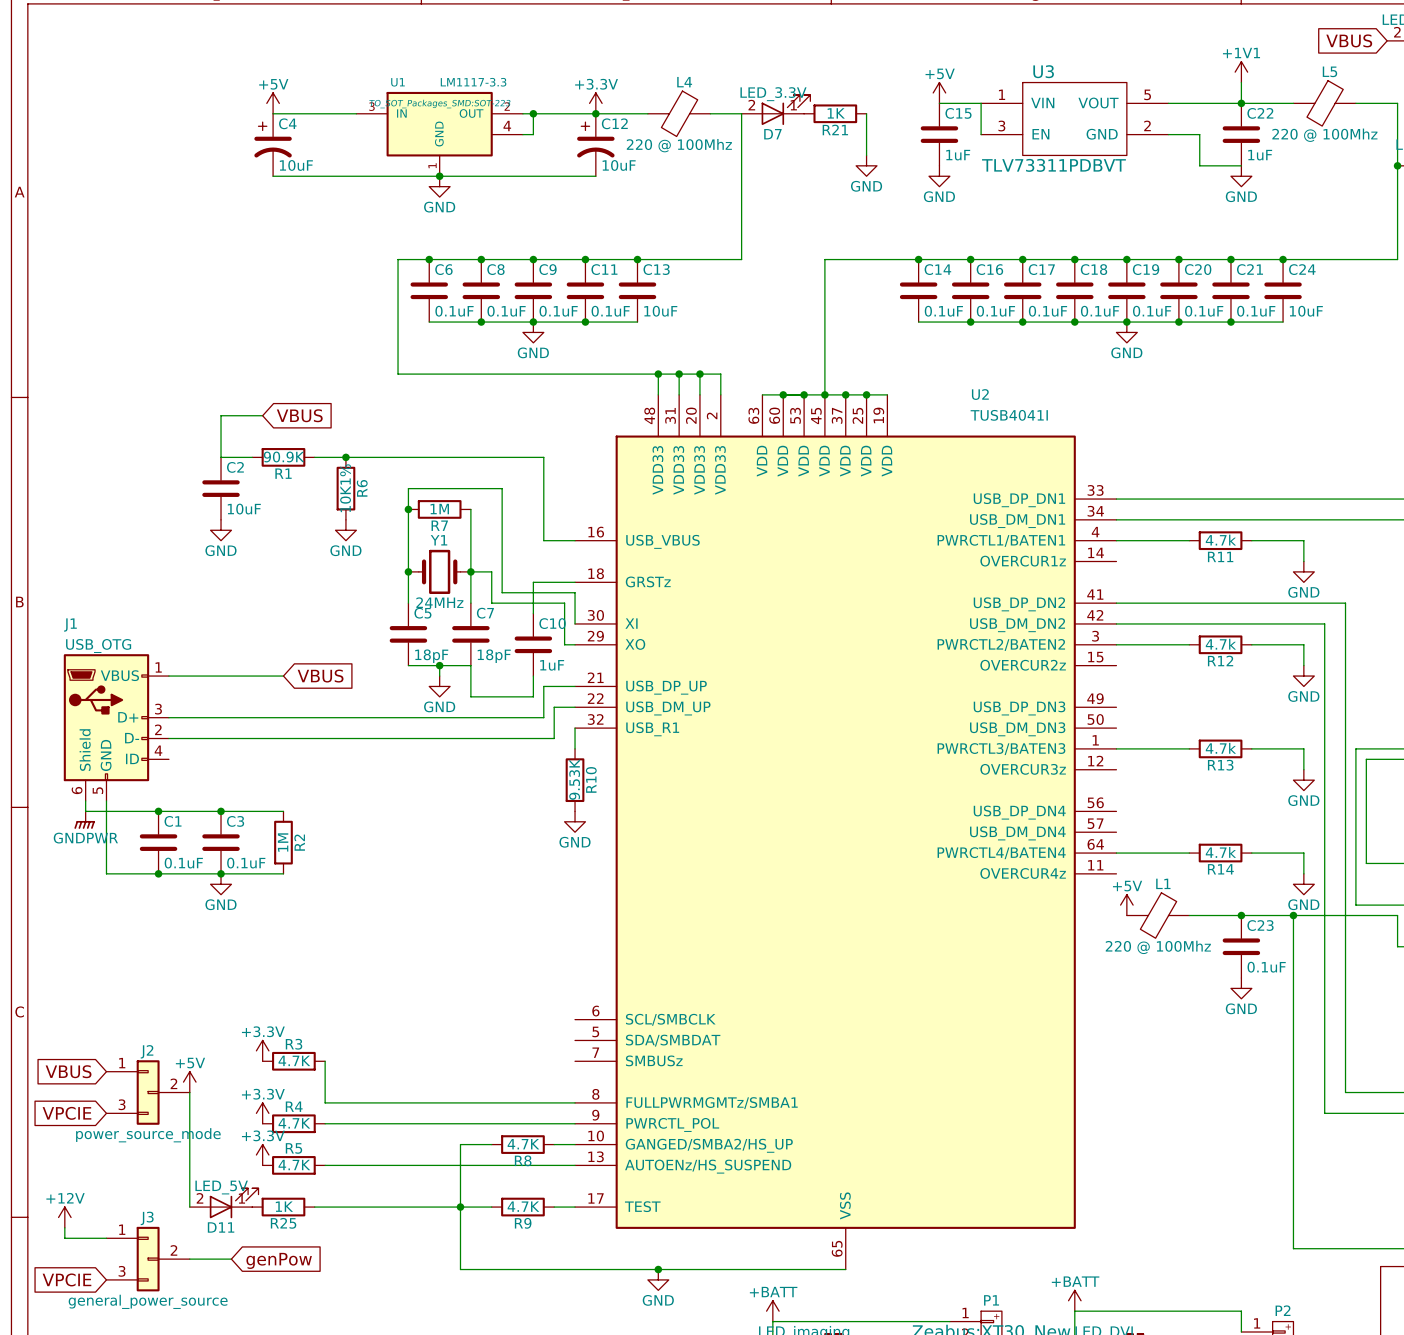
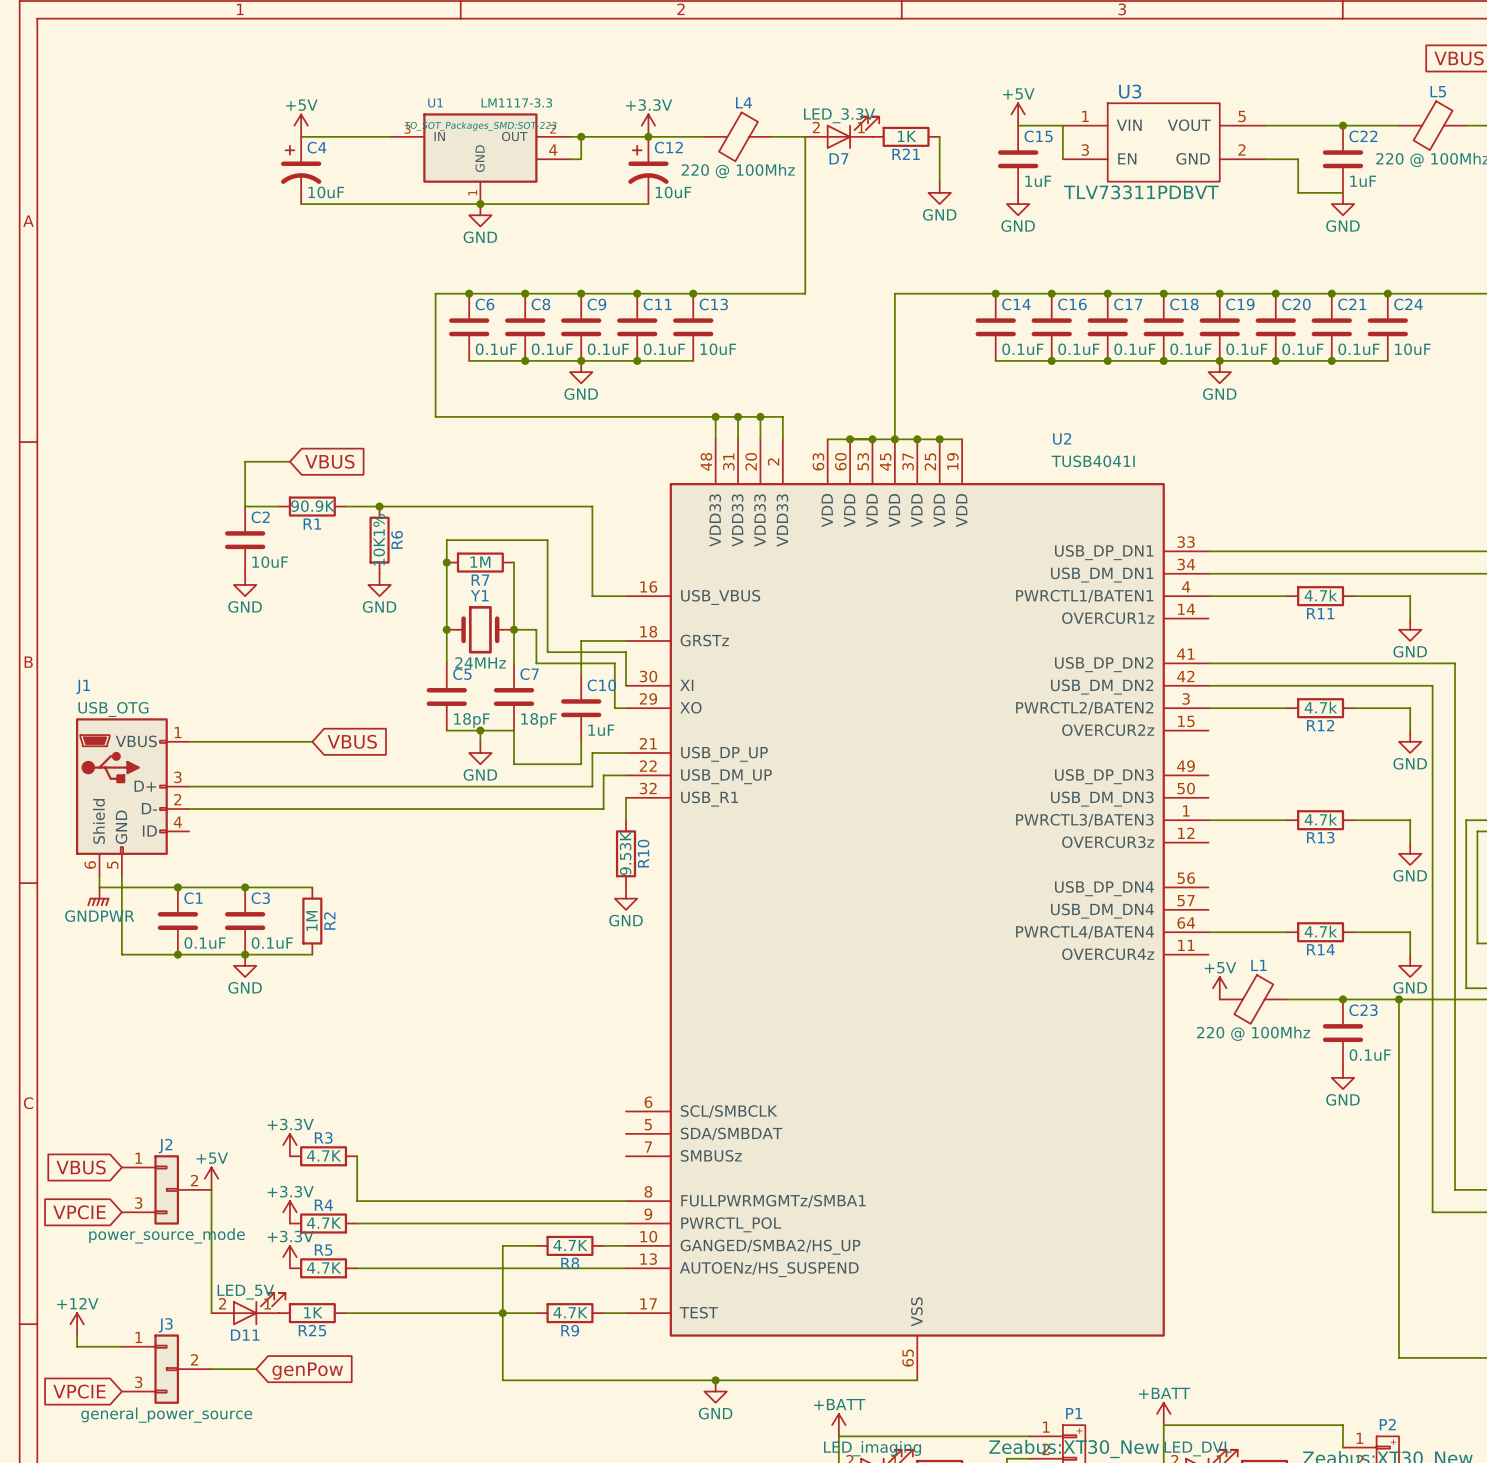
power symbol: +1V1 (1241, 72) -> none
wire: (1241, 82) (1241, 103) -> none

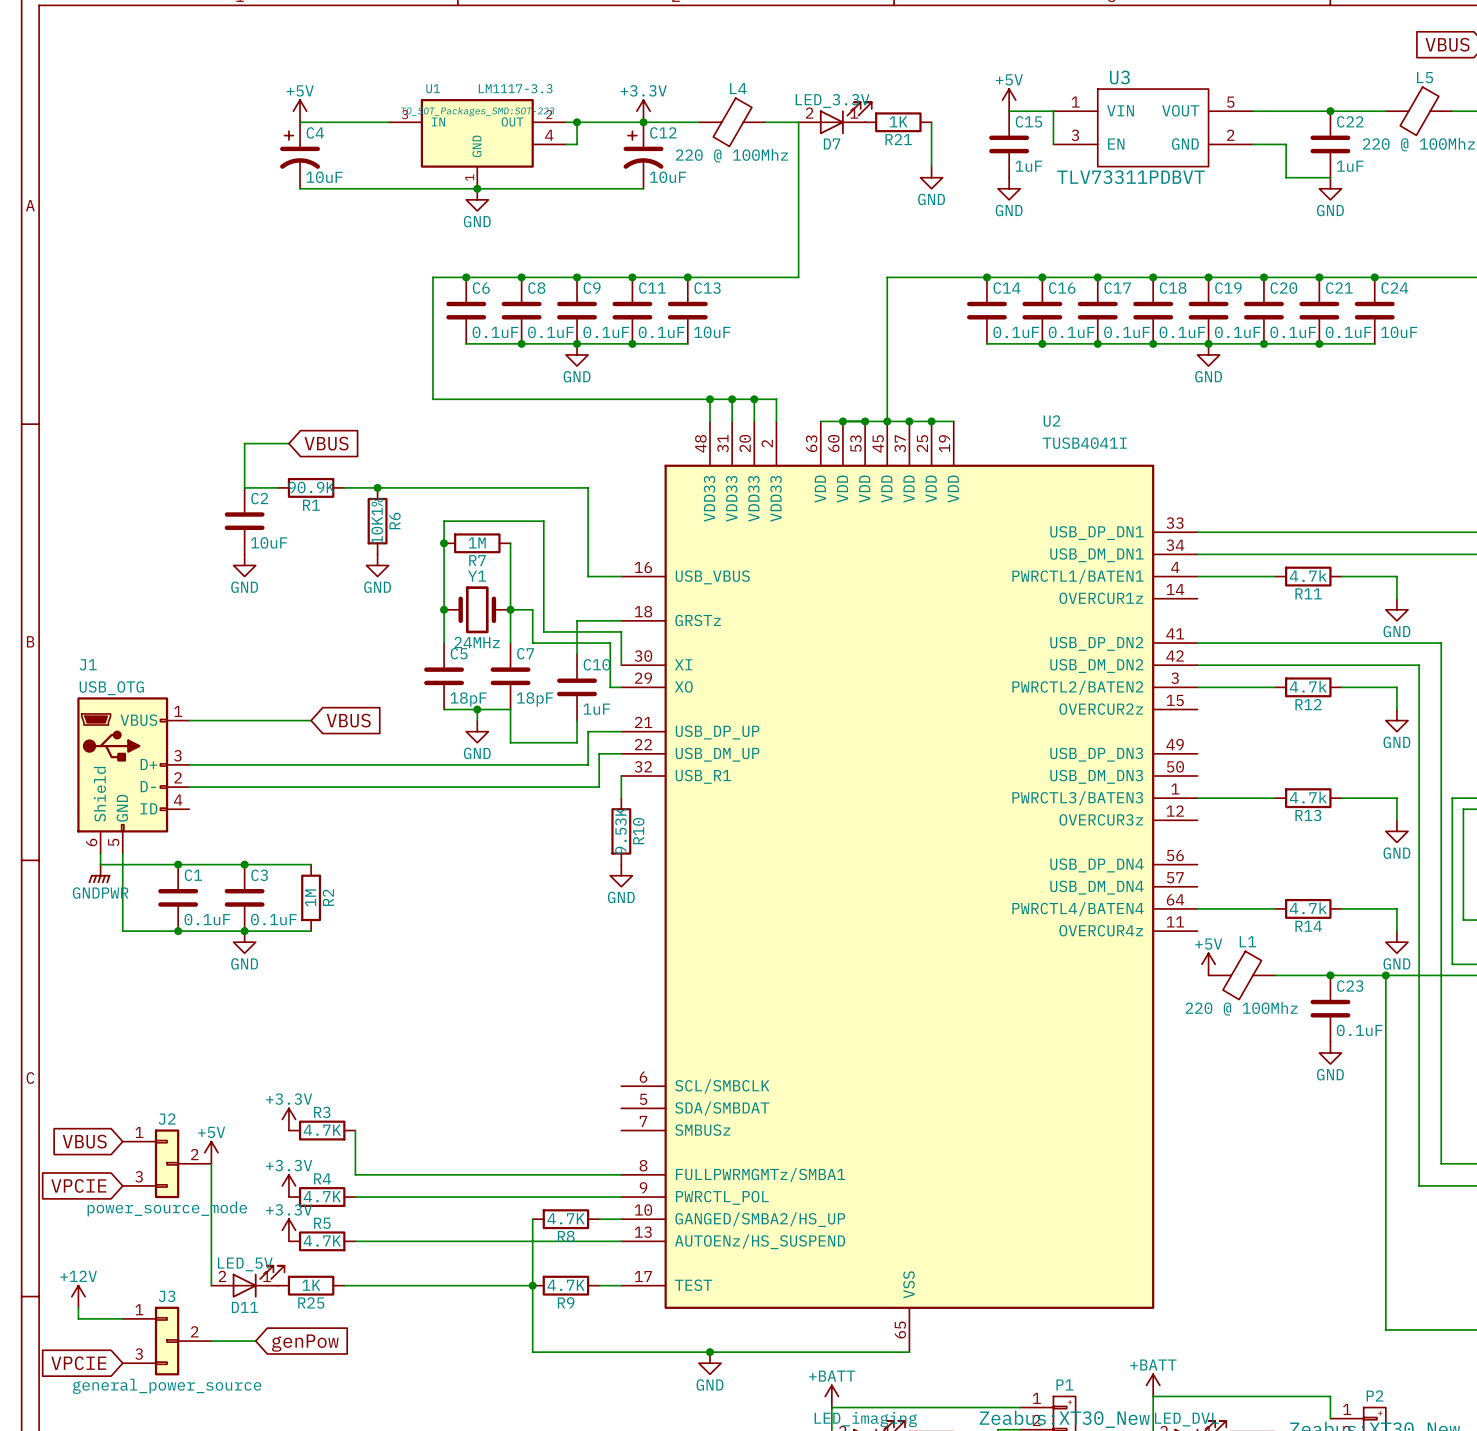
wire: (536, 1245) (502, 1245) (502, 1380) (536, 1380) -> (532, 1219) (532, 1352)
junction position: (502, 1313) -> (532, 1285)

